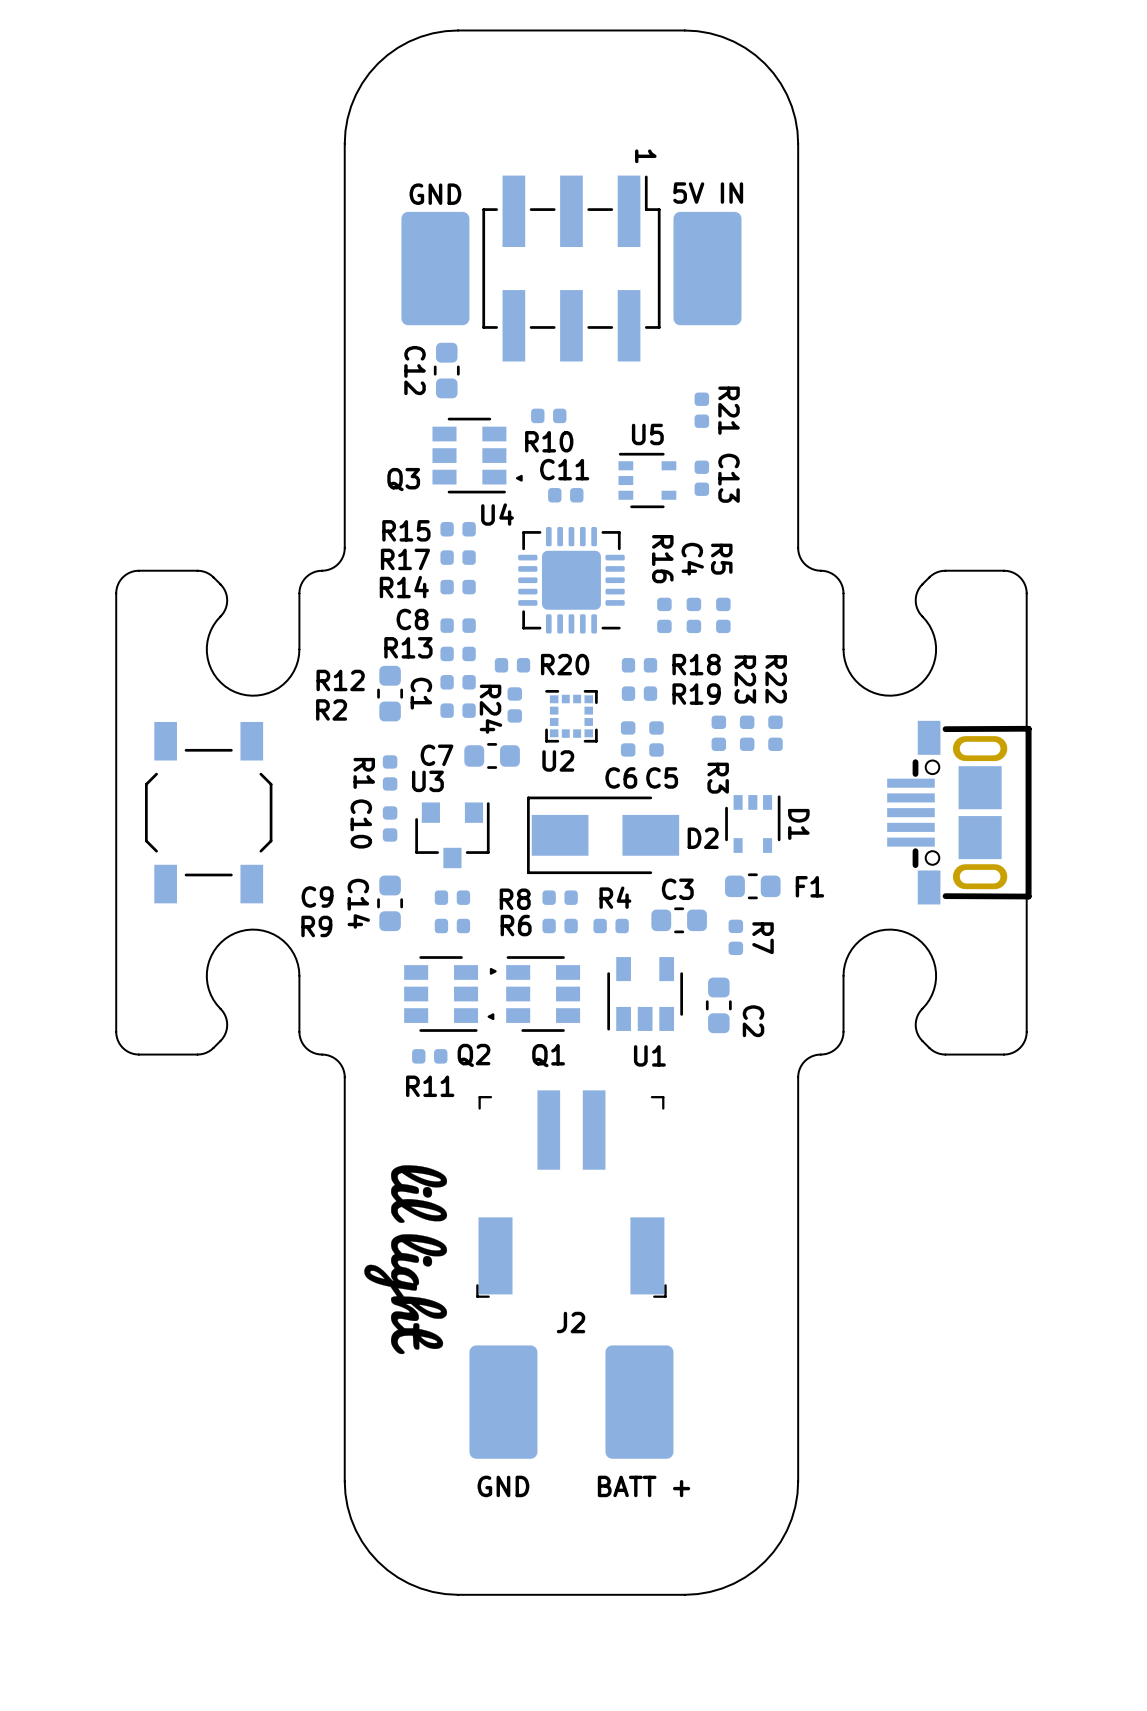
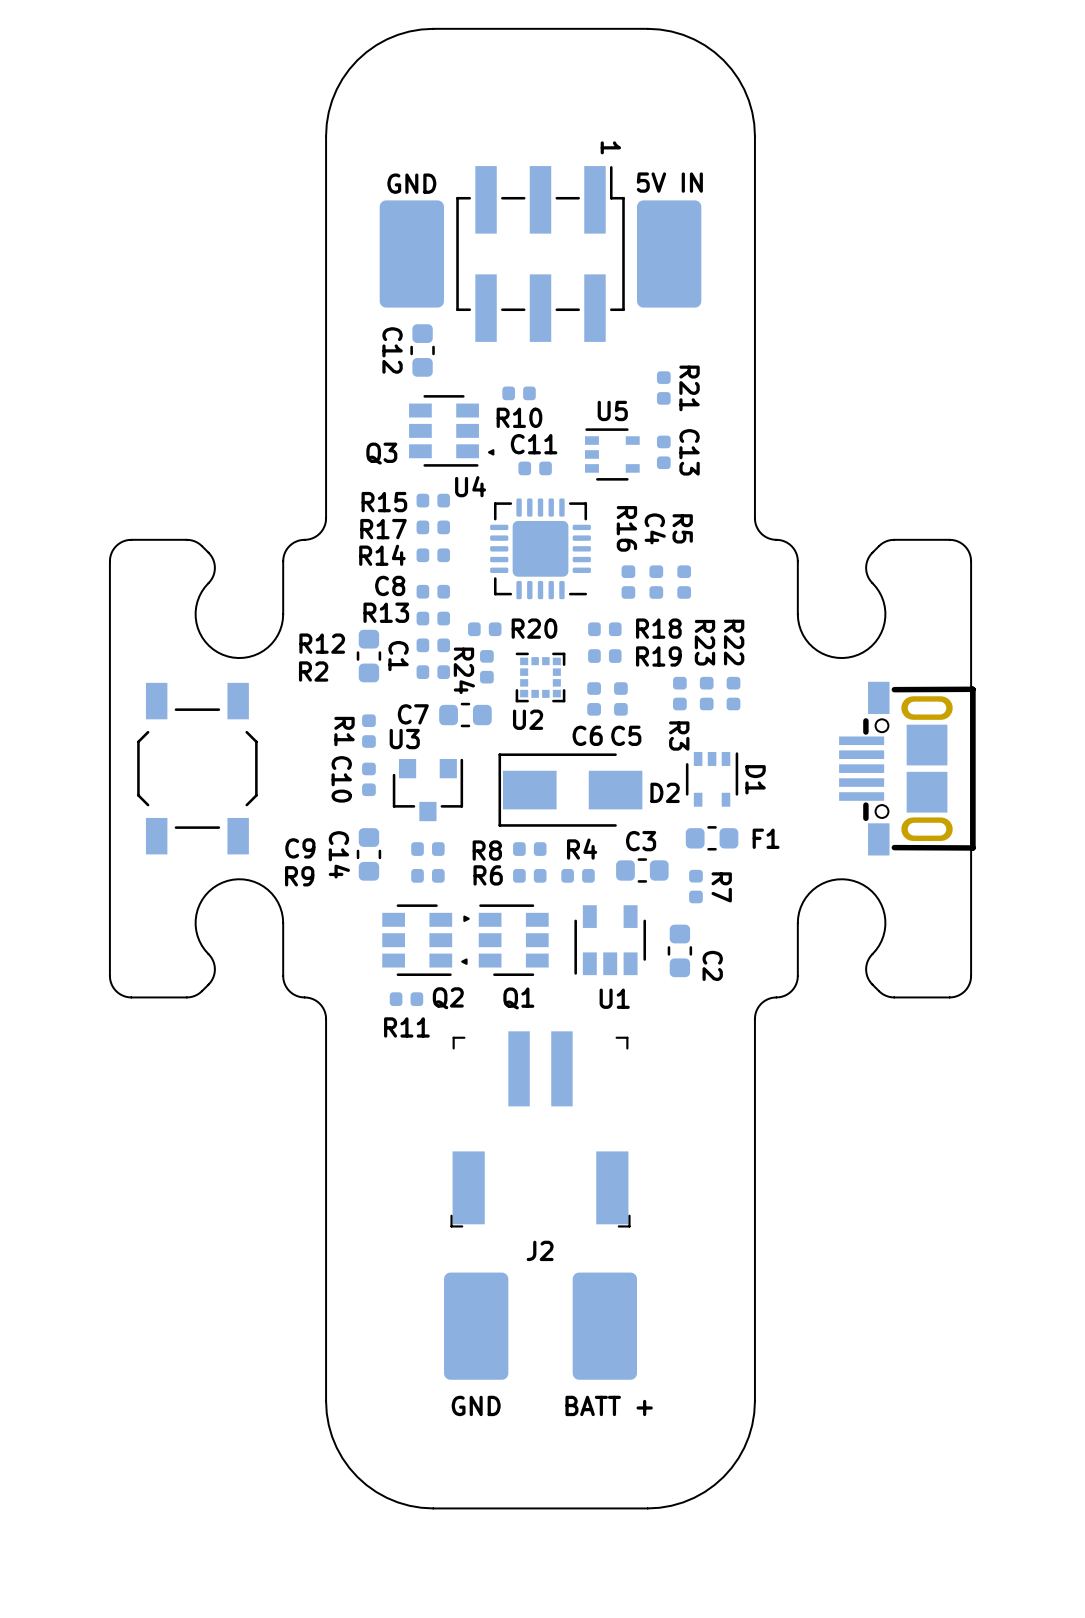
drawing: [364, 1165, 448, 1355] -> none

